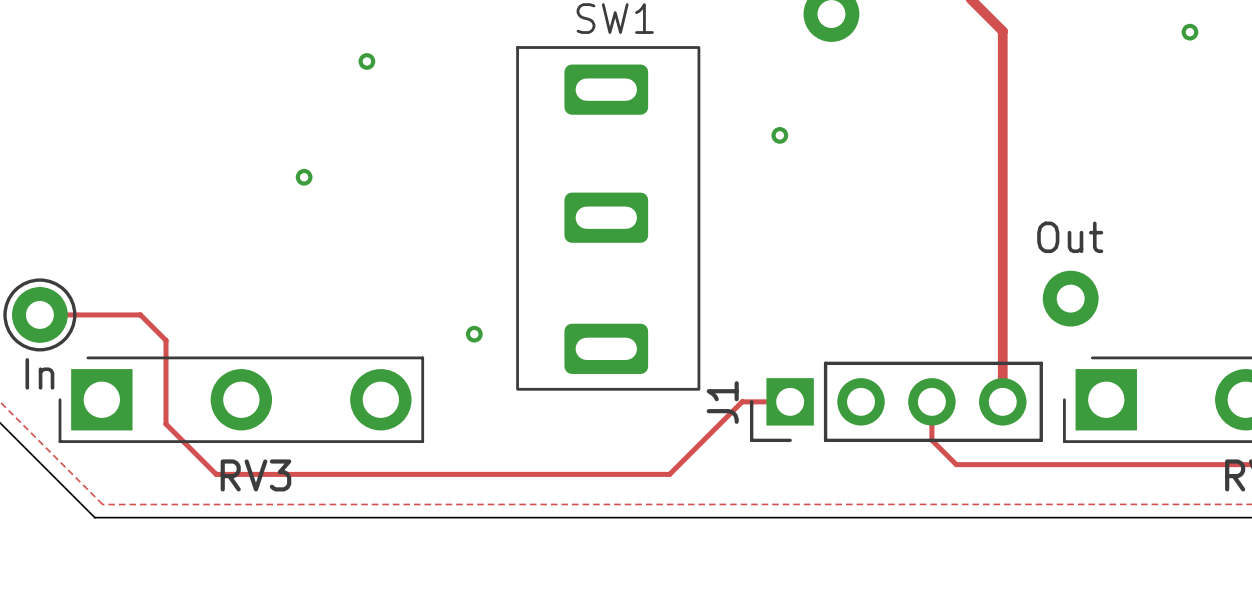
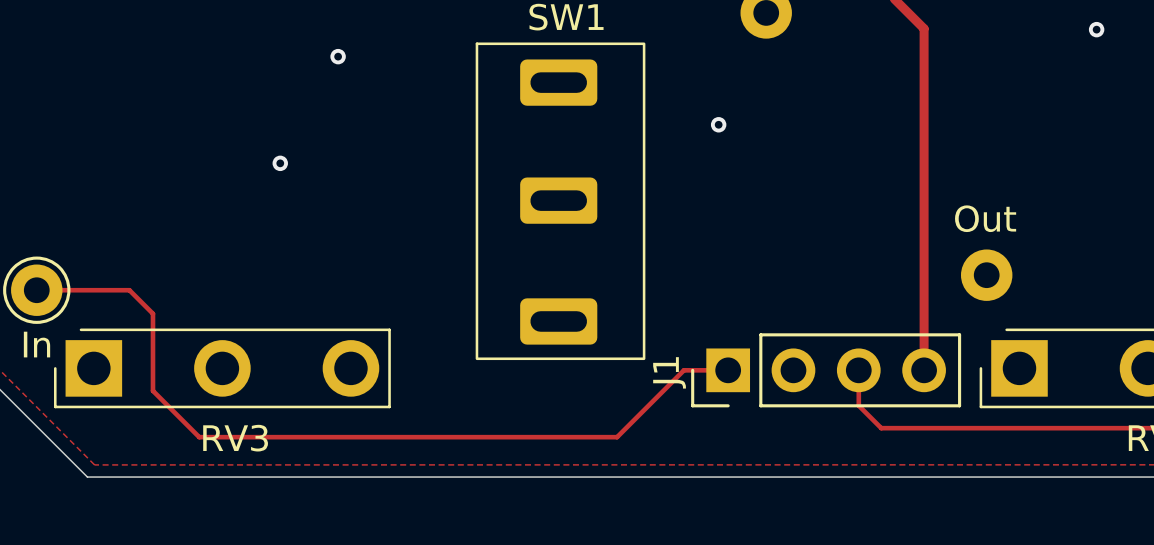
via: (474, 334) -> none

